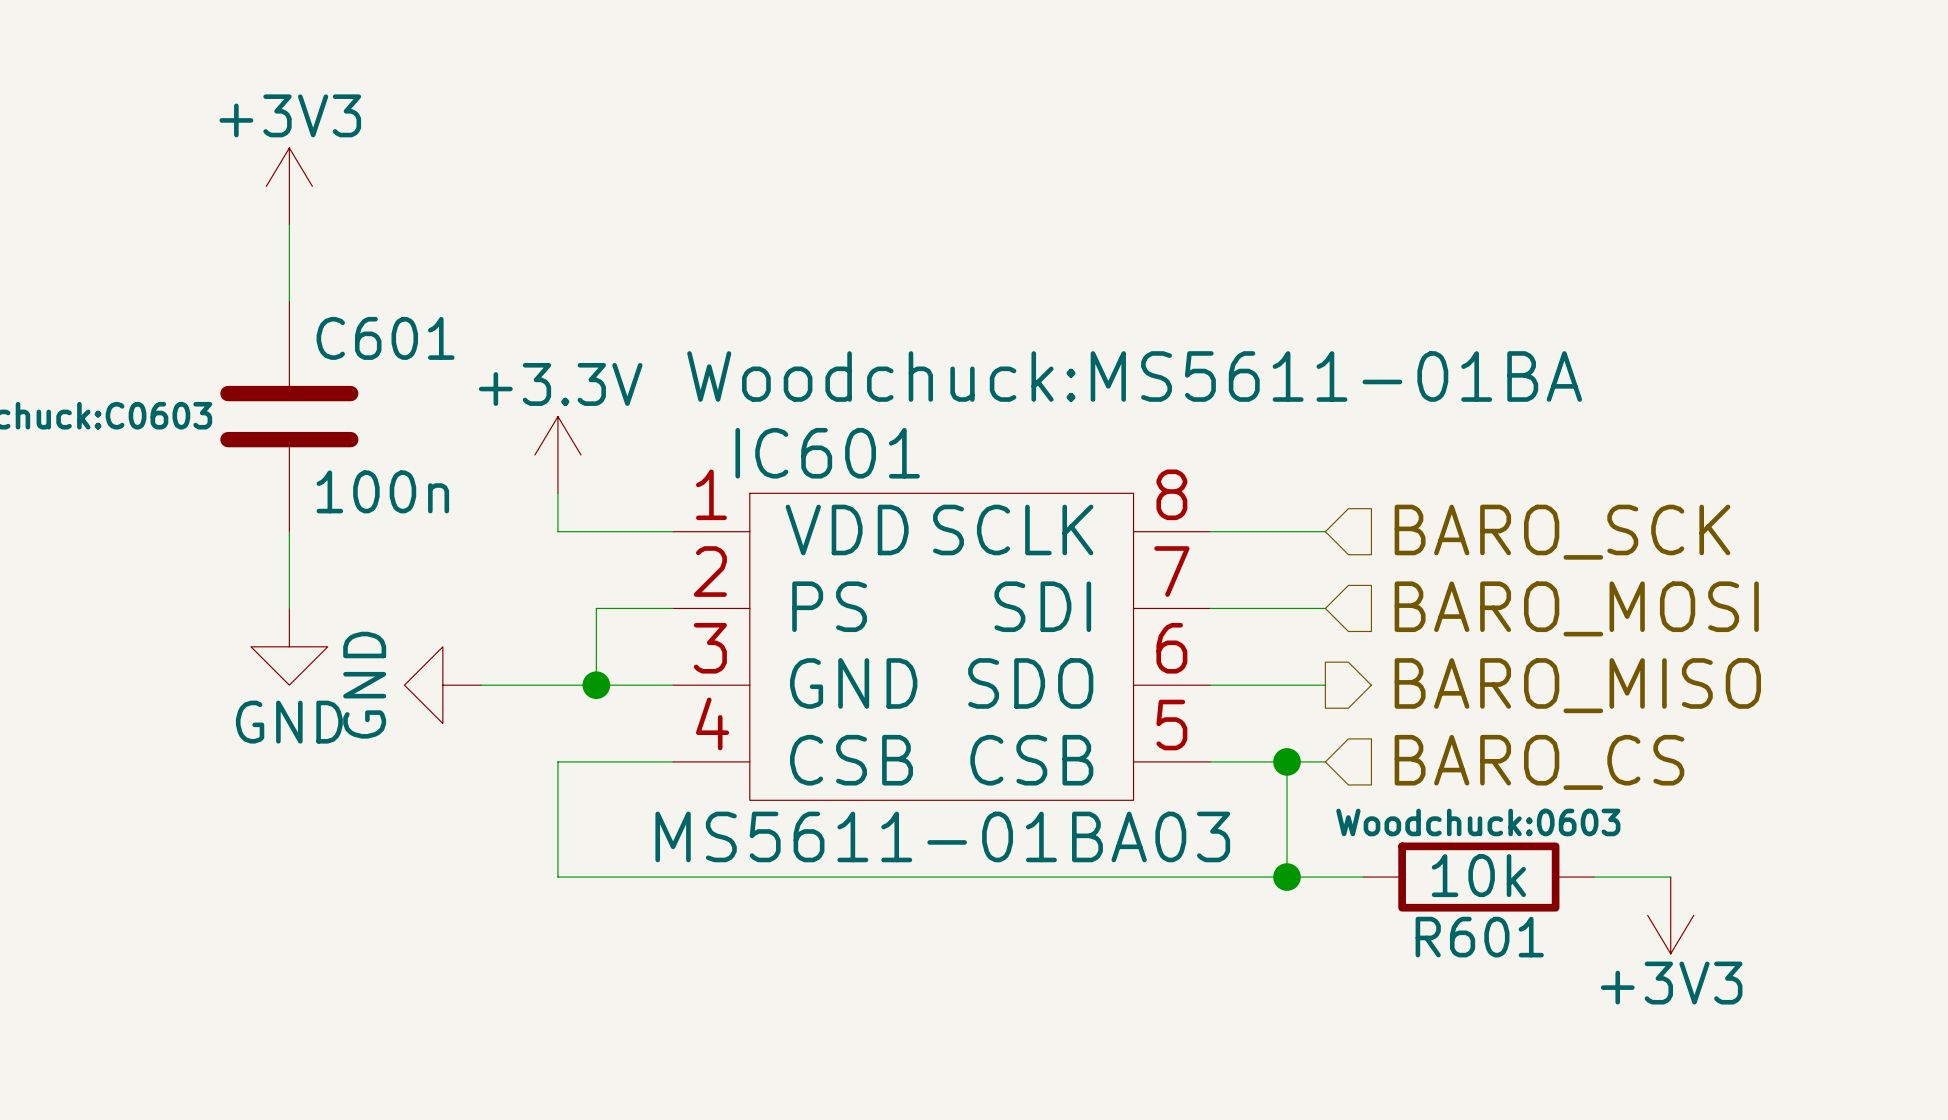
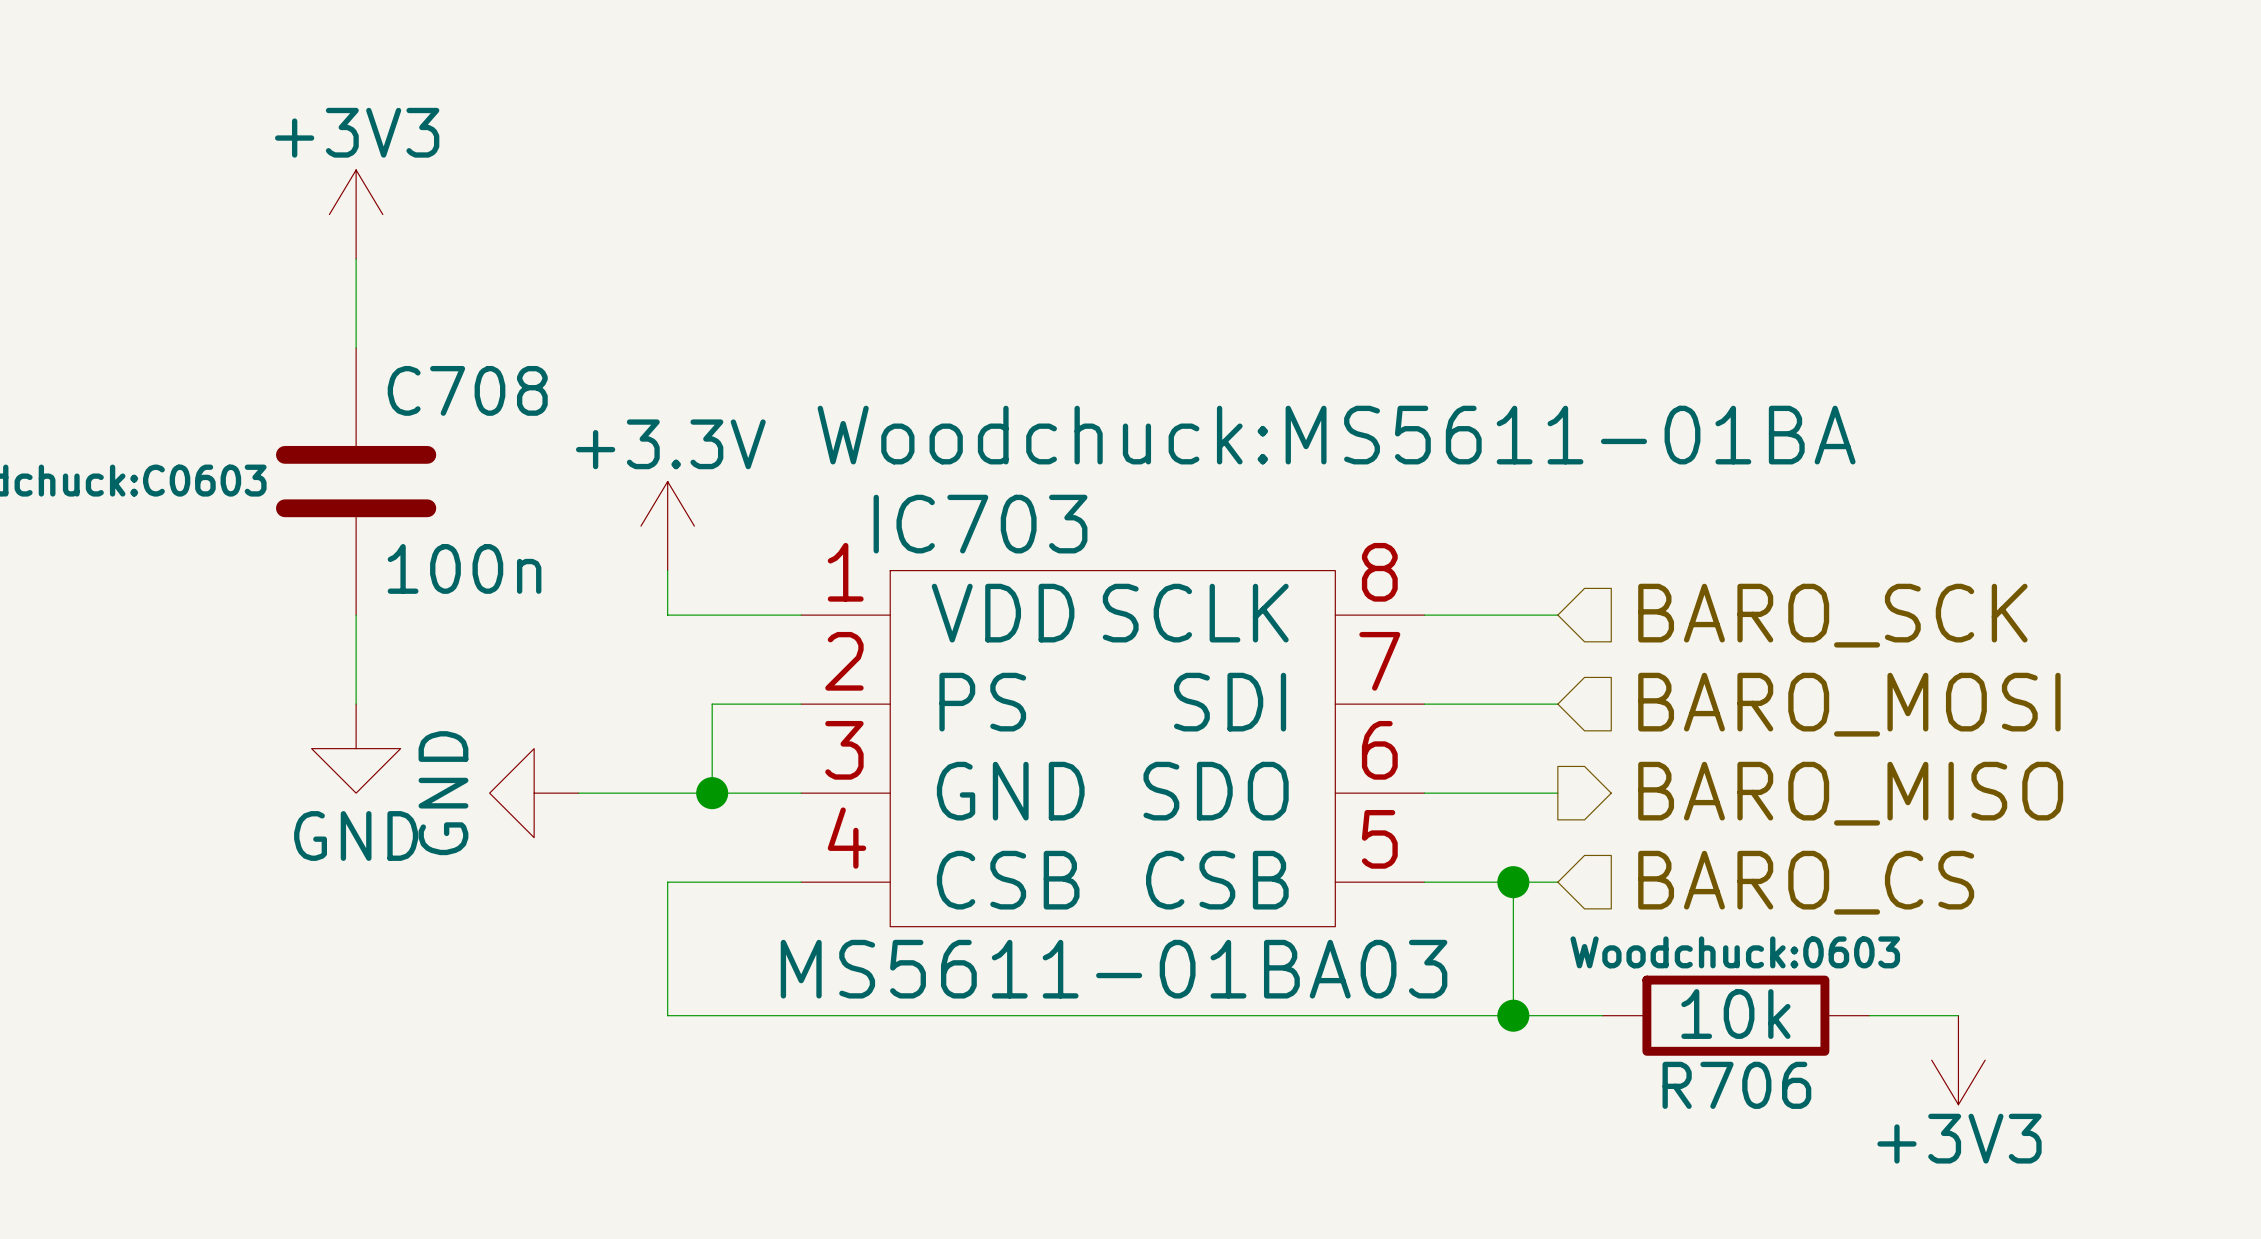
C601 name: C601 (385, 338) -> C708 (467, 390)
IC601 name: IC601 (827, 453) -> IC703 (980, 524)
R601 name: R601 (1479, 937) -> R706 (1736, 1085)

